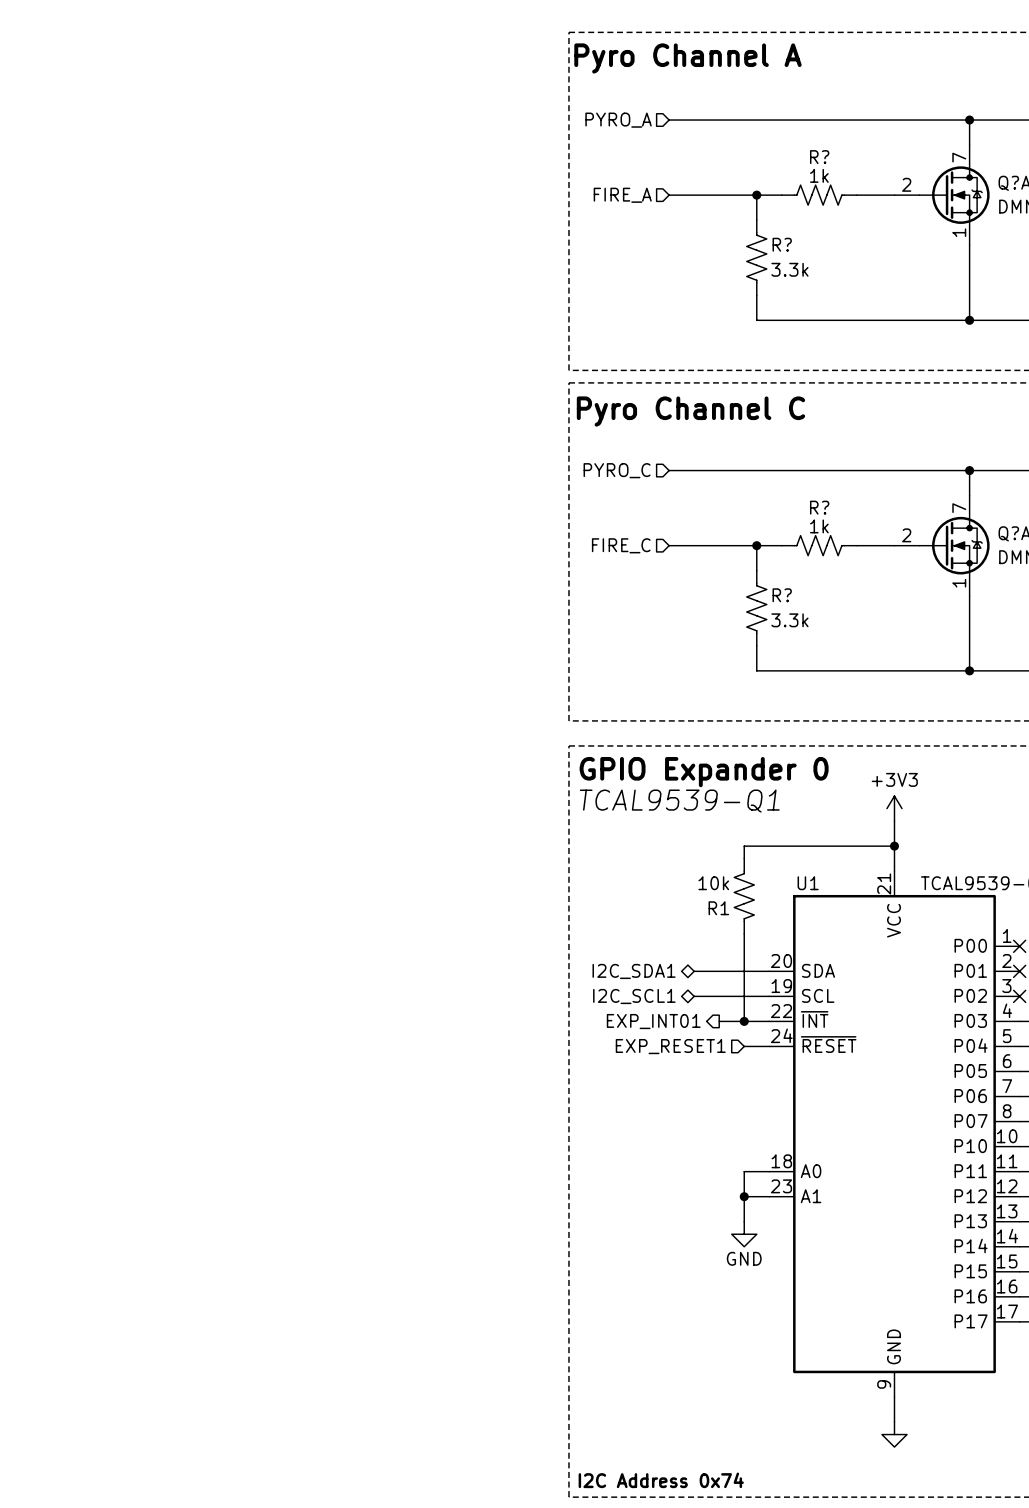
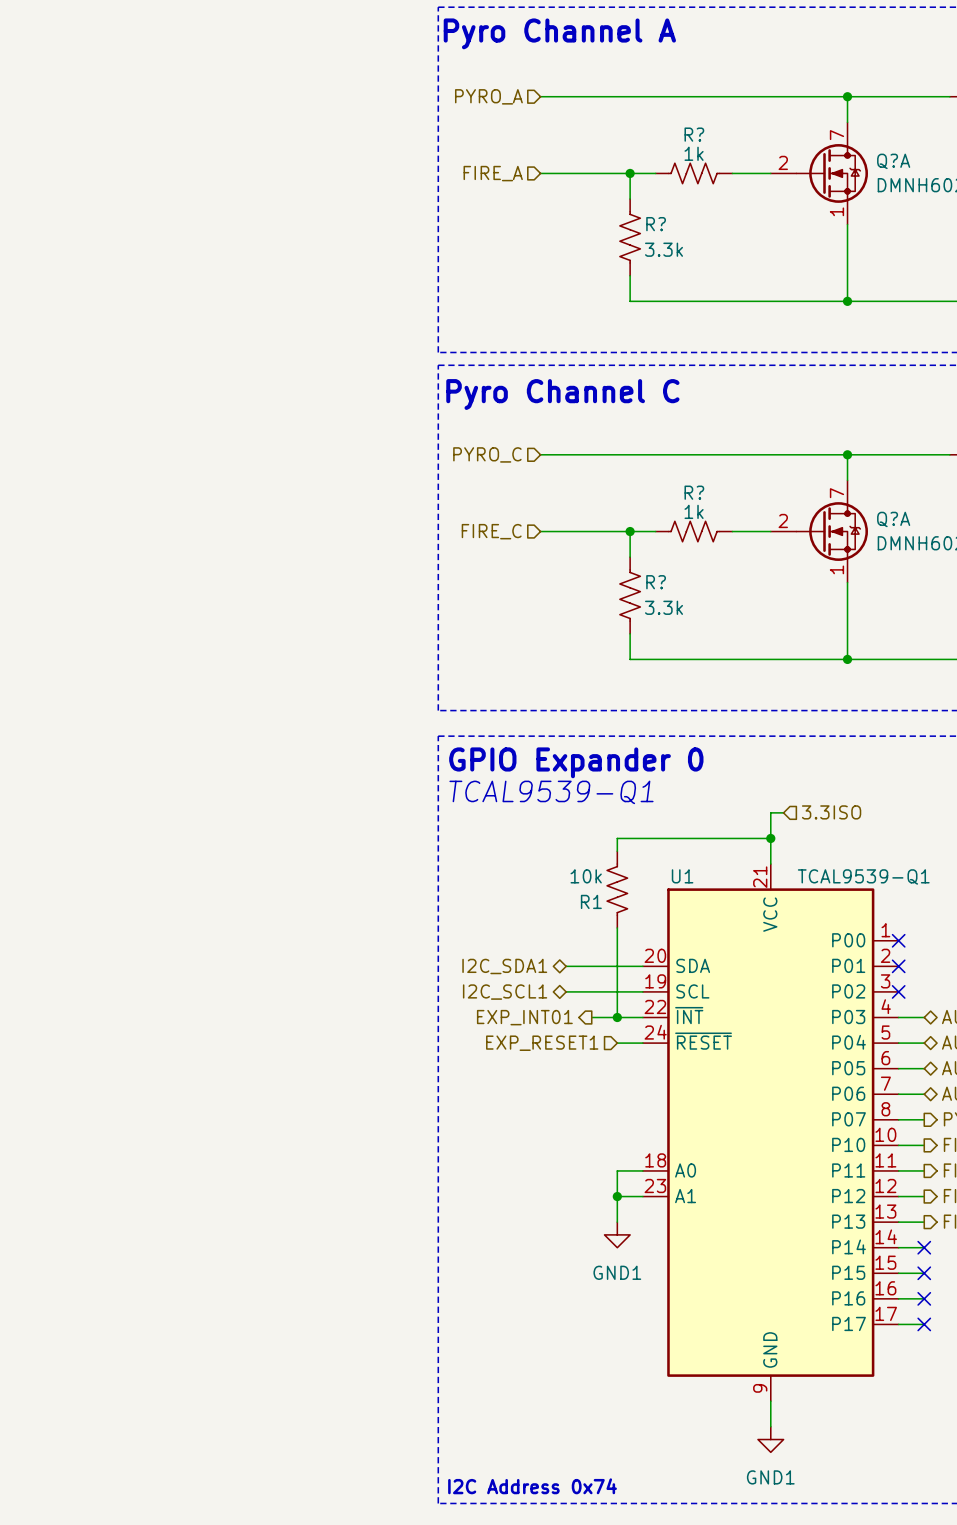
power symbol: +3V3 (894, 808) -> none
hierarchical label: none -> 3.3ISO (831, 812)
wire: none -> (770, 812) (783, 812)
power symbol: GND (744, 1234) -> GND1 (617, 1234)
power symbol text: none -> GND1 (770, 1477)

